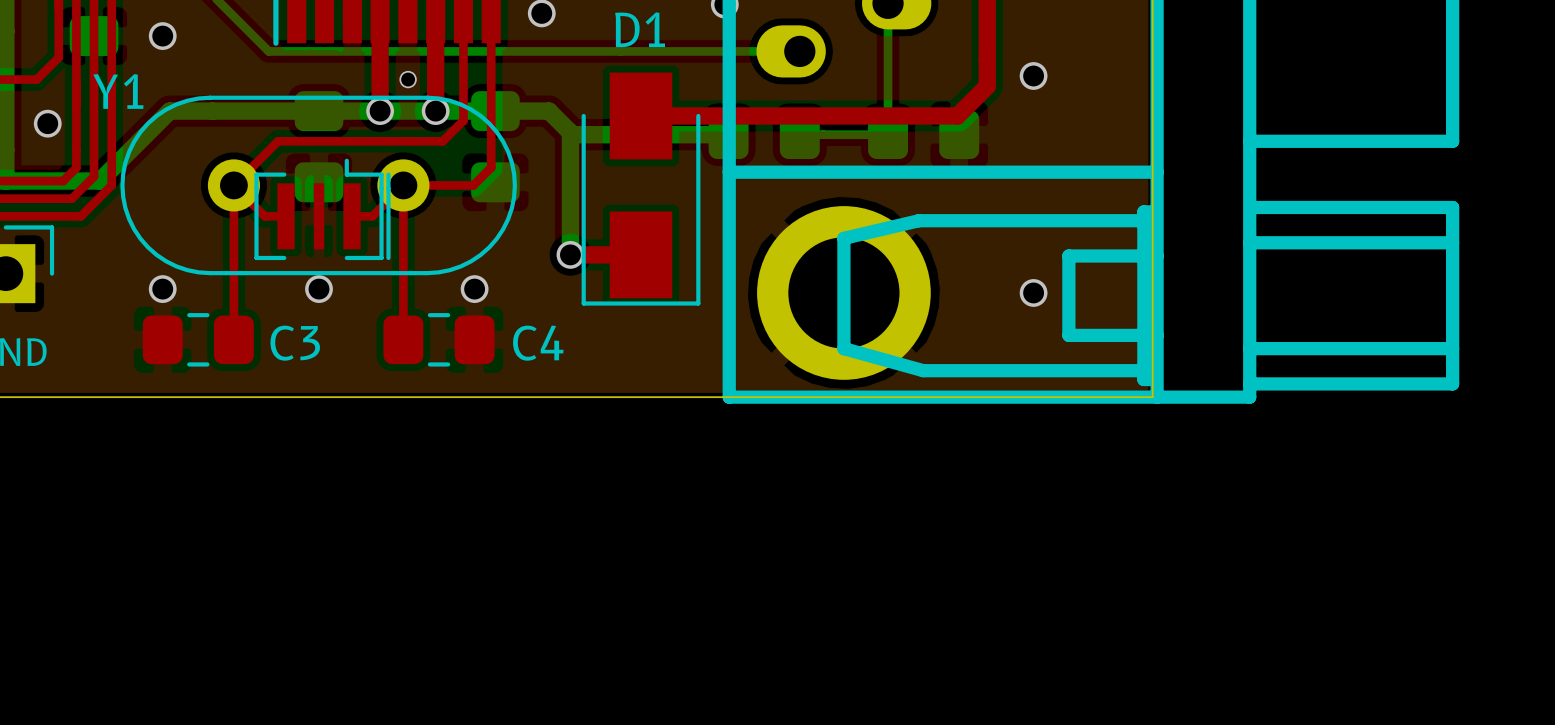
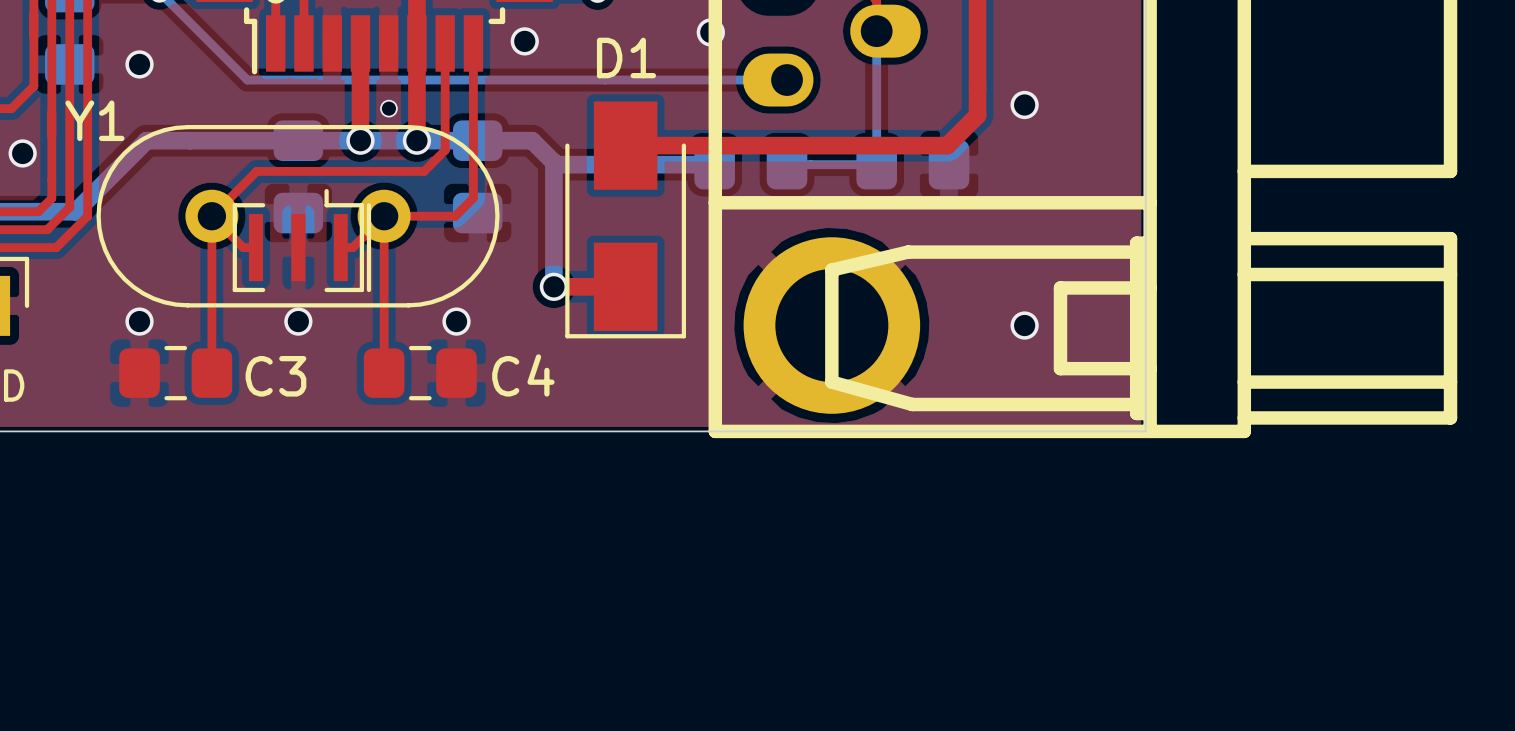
part footprint: [254, 158, 391, 261] -> [232, 189, 372, 293]

